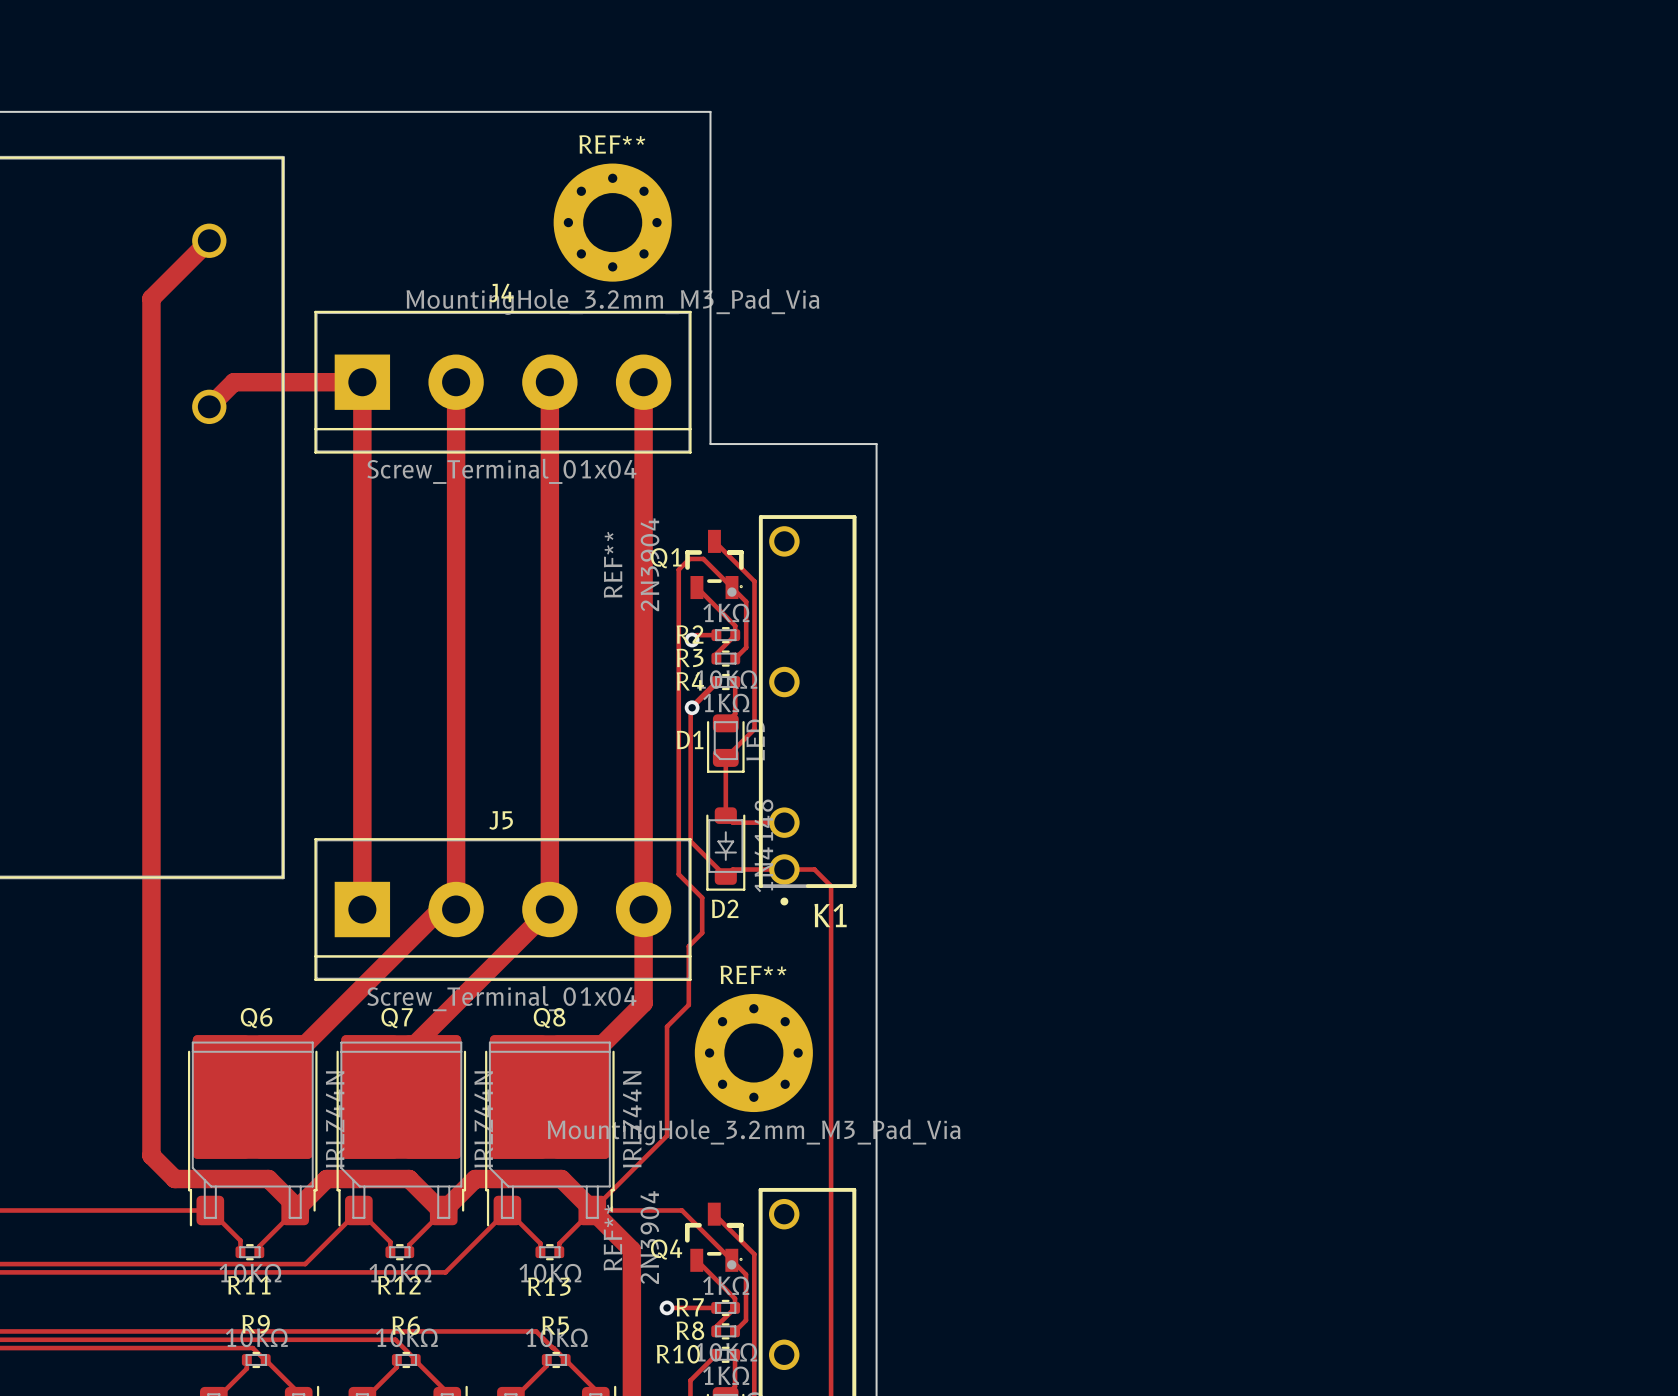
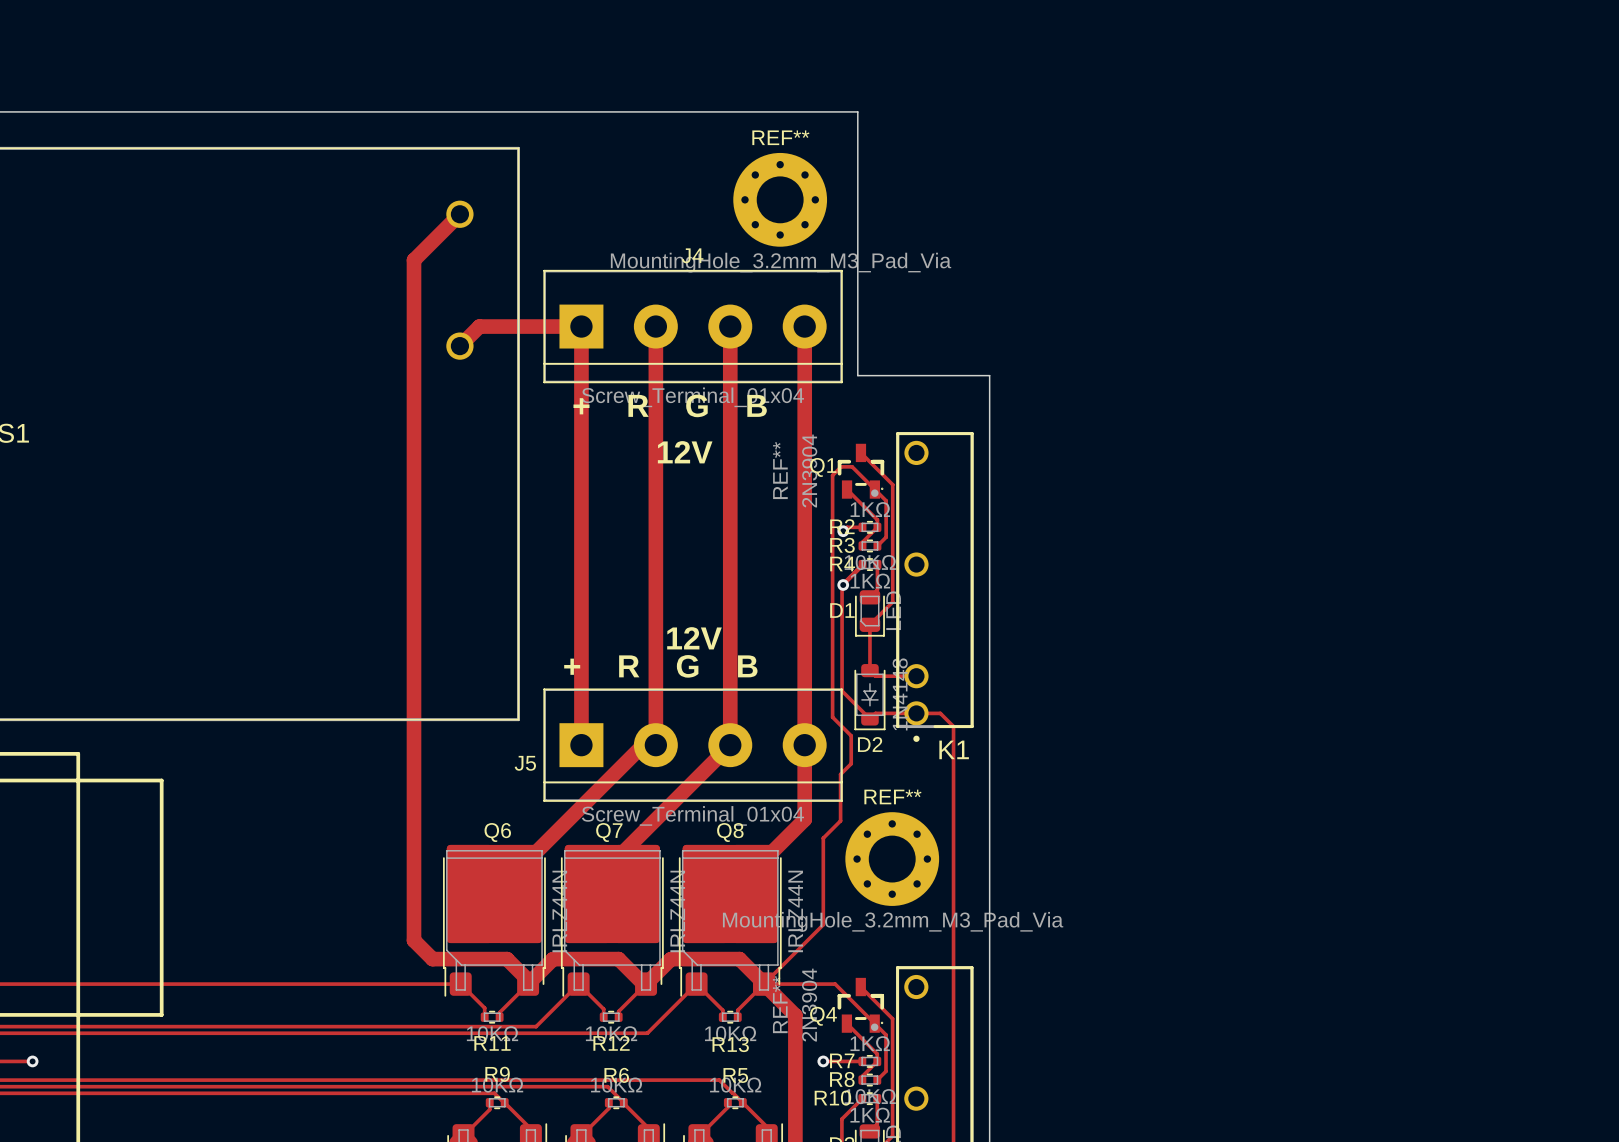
text: none -> + R G B (670, 405)
text: none -> 12V (685, 452)
text: none -> 12V (694, 638)
text: none -> + R G B (660, 666)
J5 name position: J5 (501, 820) -> J5 (525, 763)

